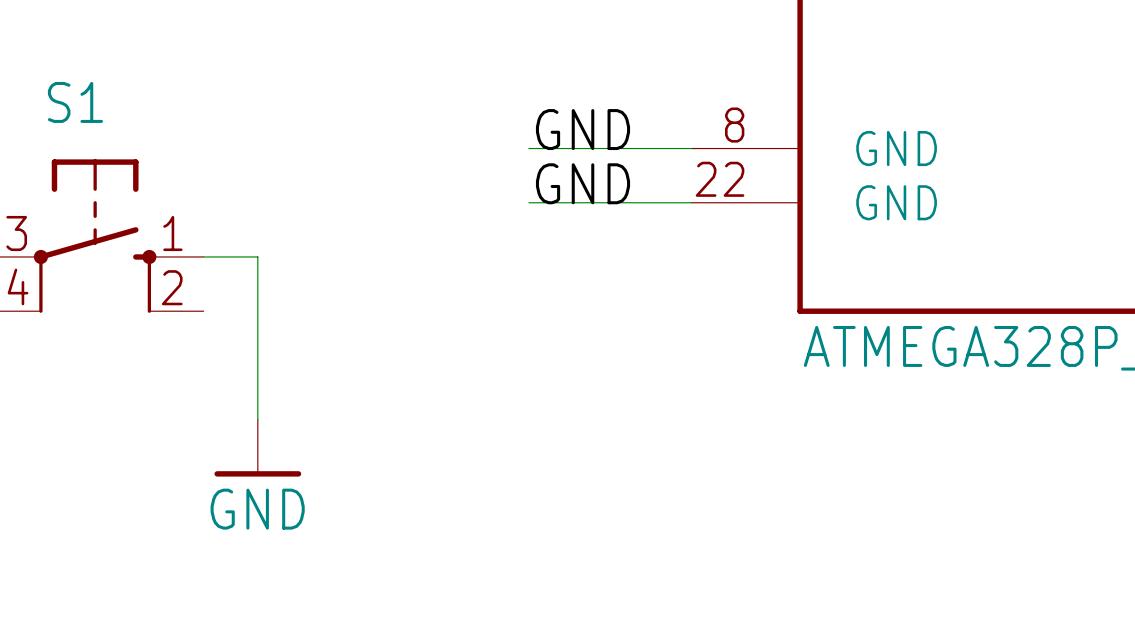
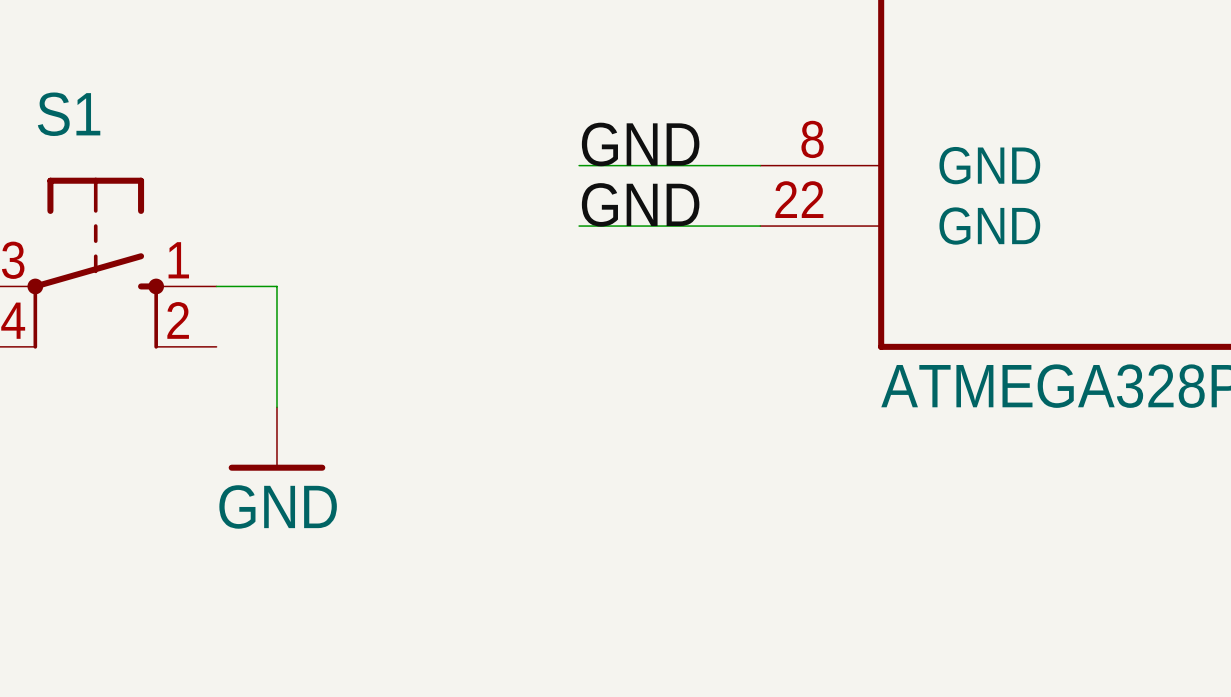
power symbol position: GND (257, 448) -> GND (276, 439)

